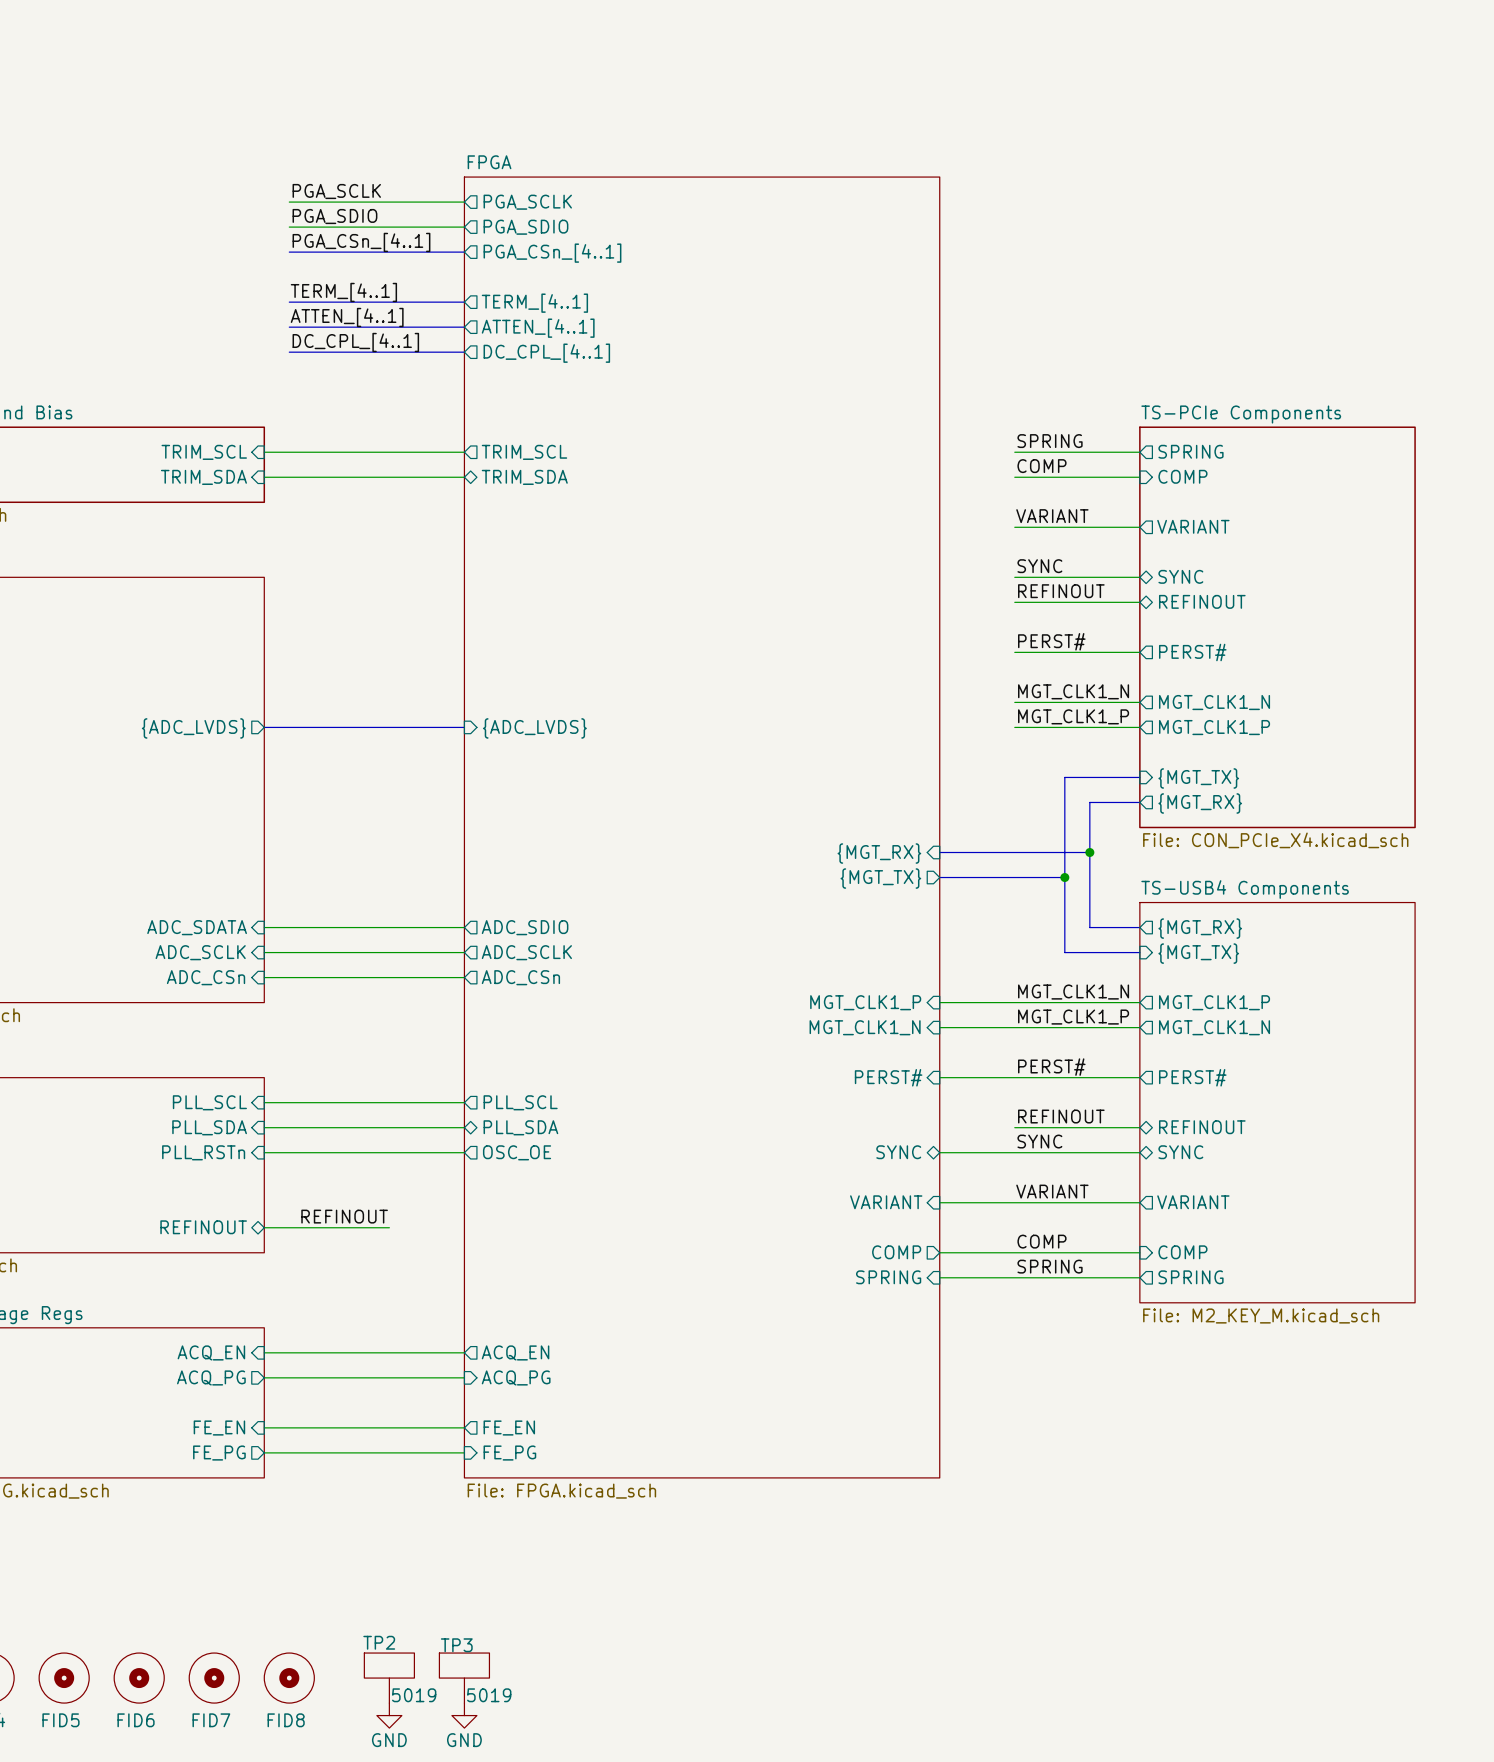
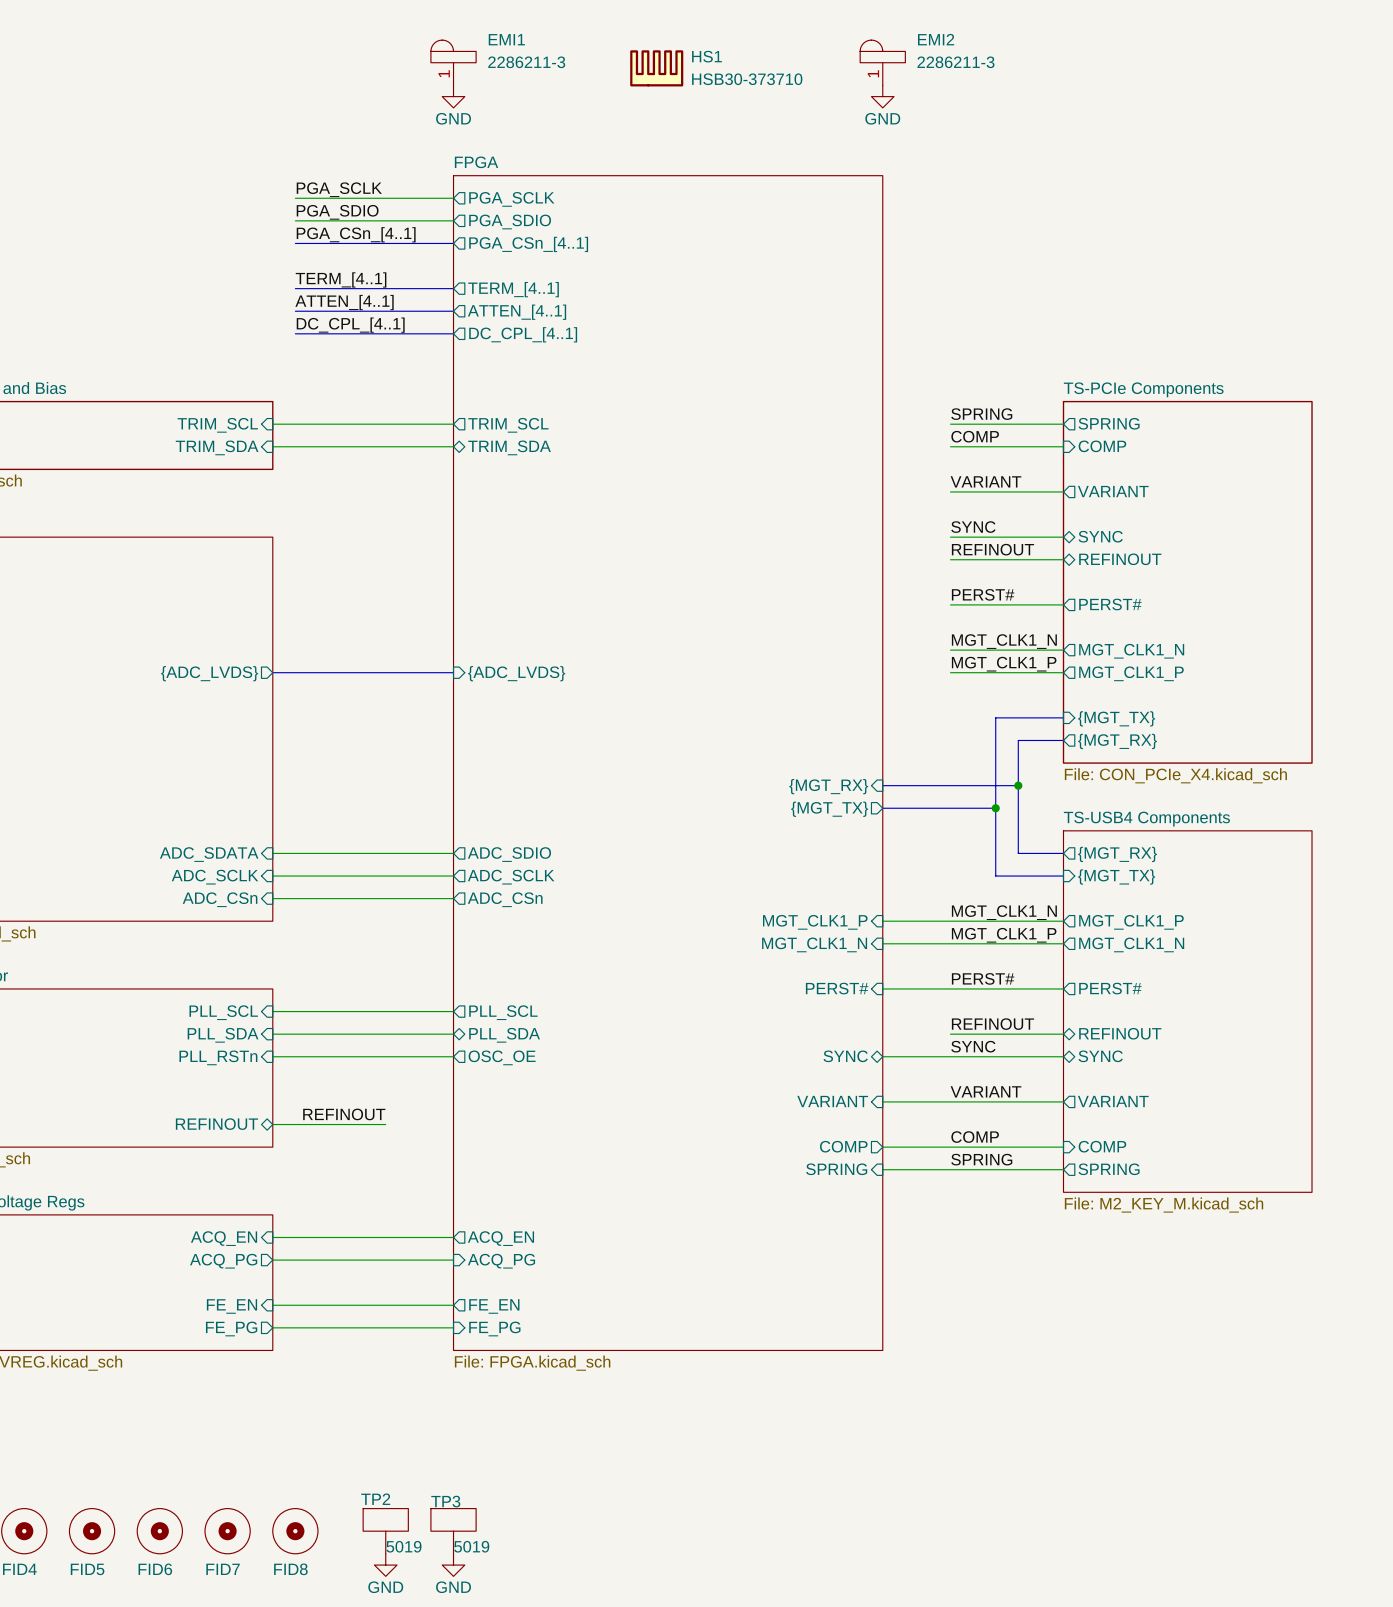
EMI1: none -> 2286211-3 (453, 62)
EMI2: none -> 2286211-3 (882, 62)
HS1: none -> HSB30-373710 (656, 68)
power symbol: none -> GND (453, 96)
power symbol: none -> GND (882, 96)

